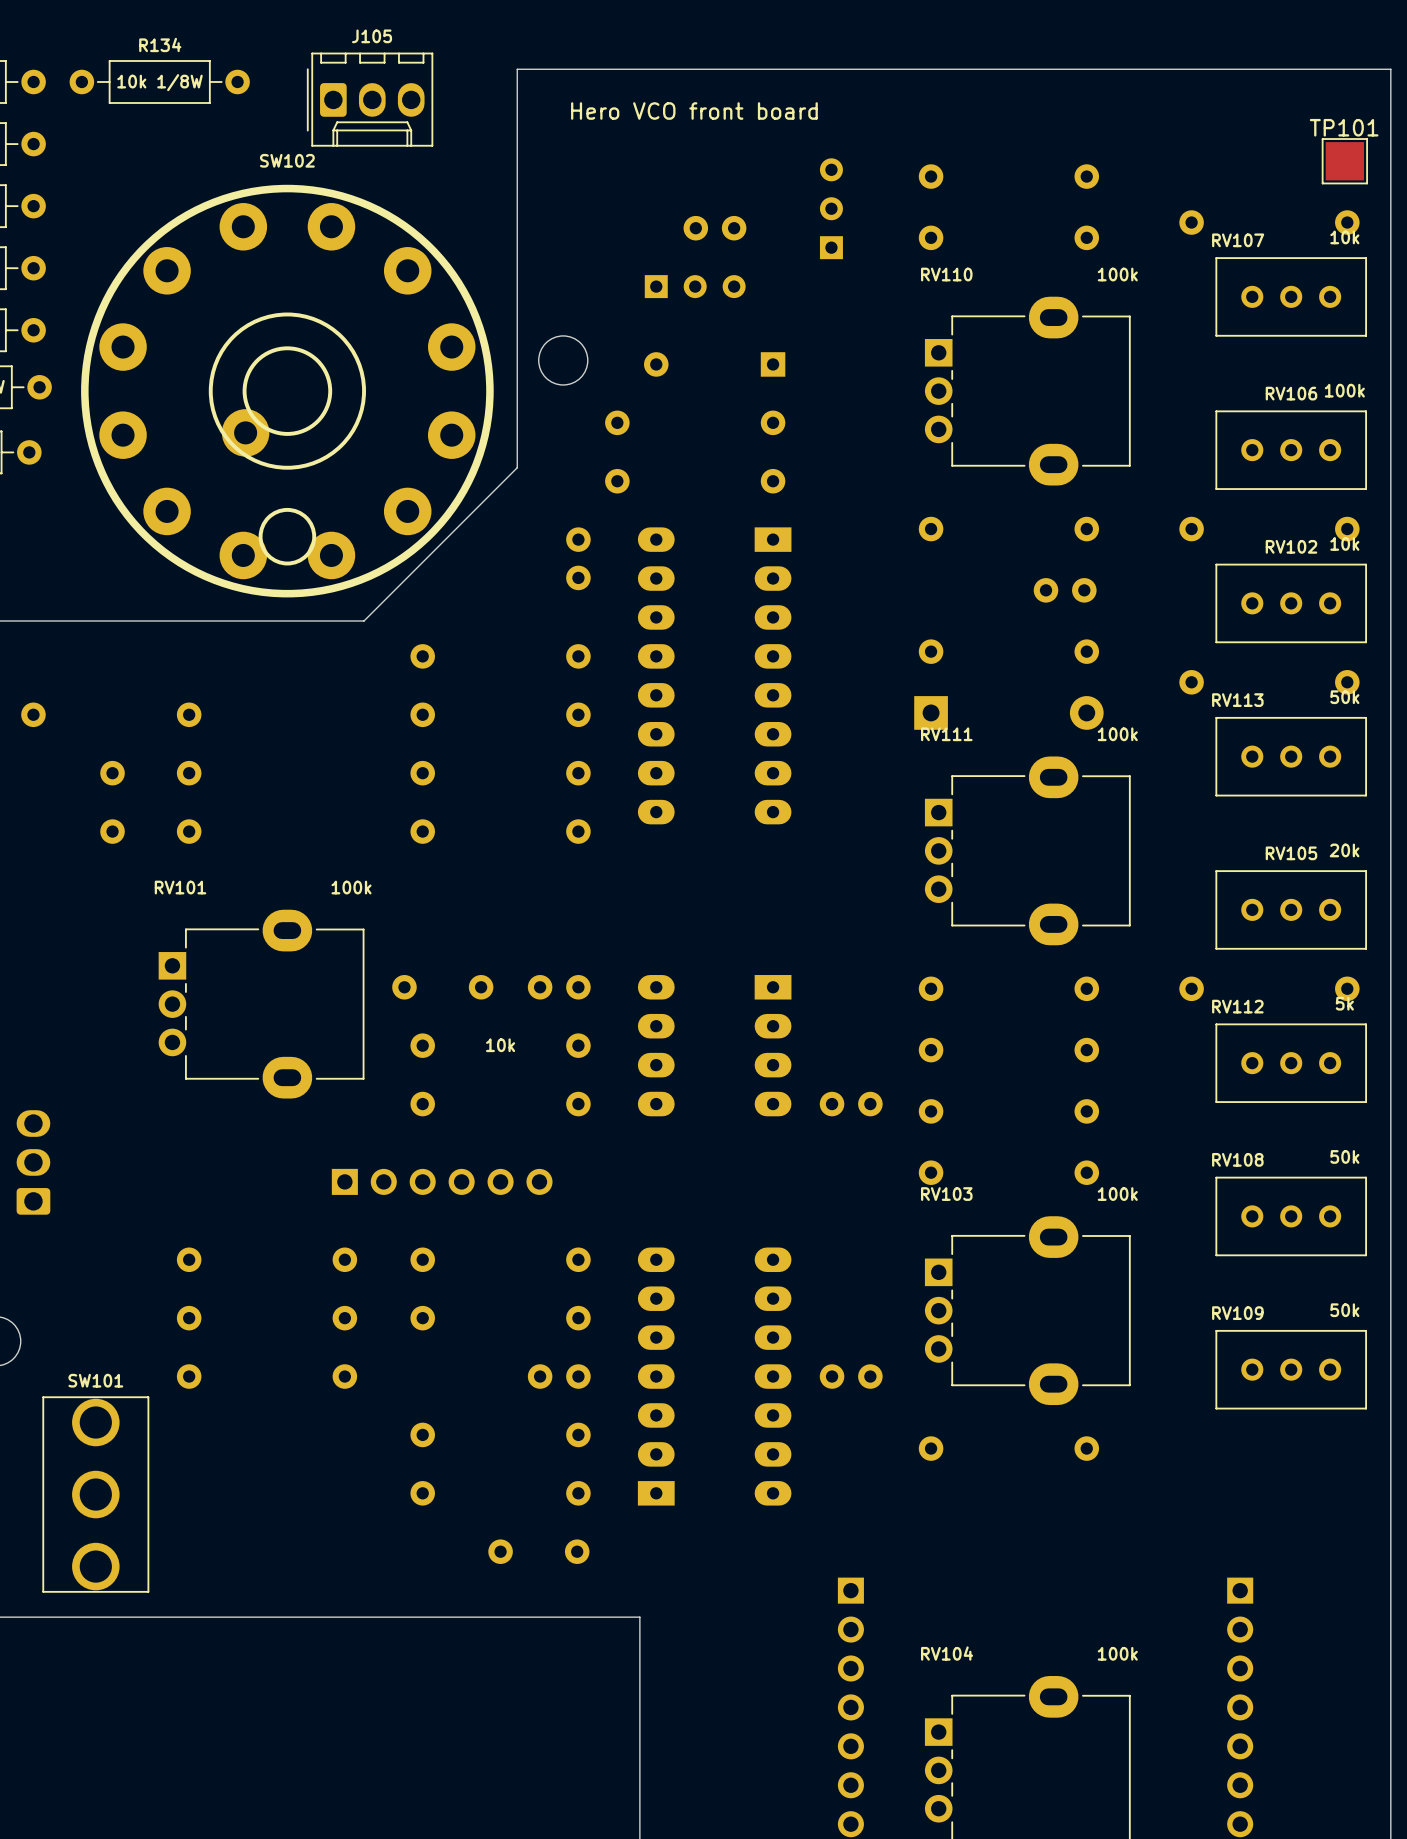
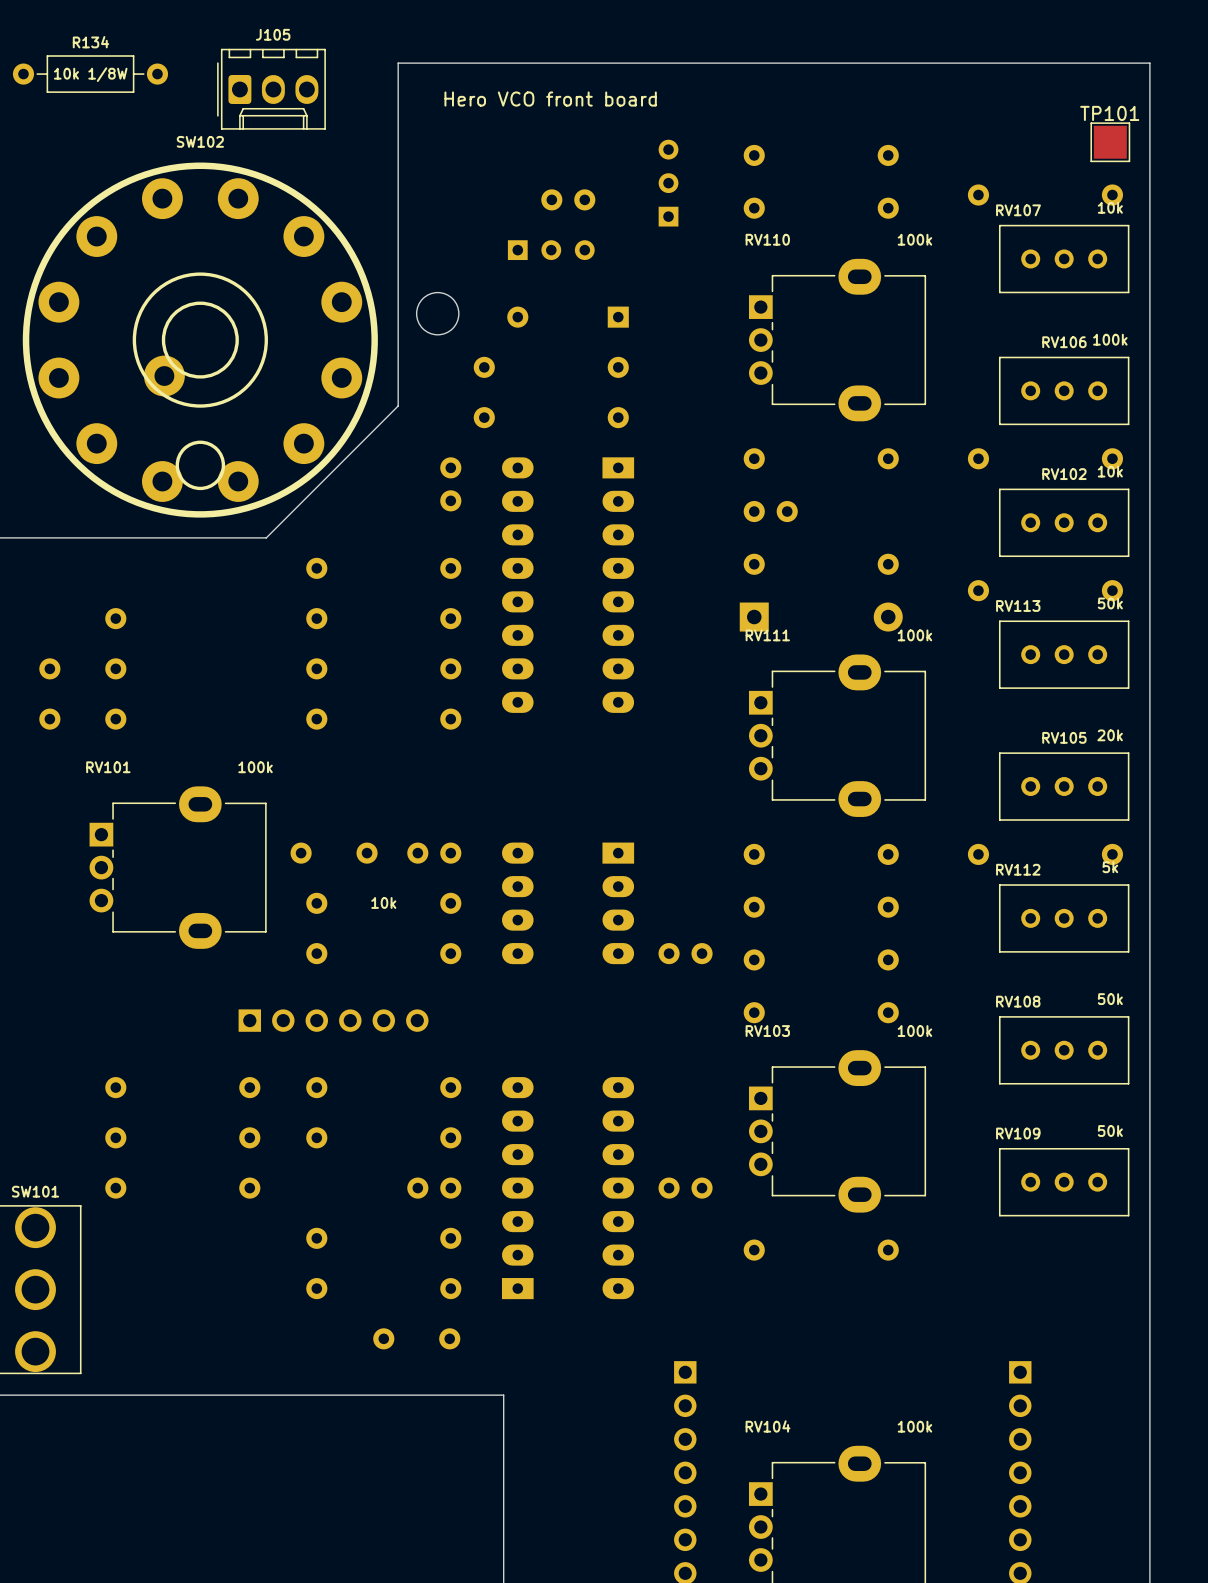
part position: (1065, 590) -> (770, 511)

